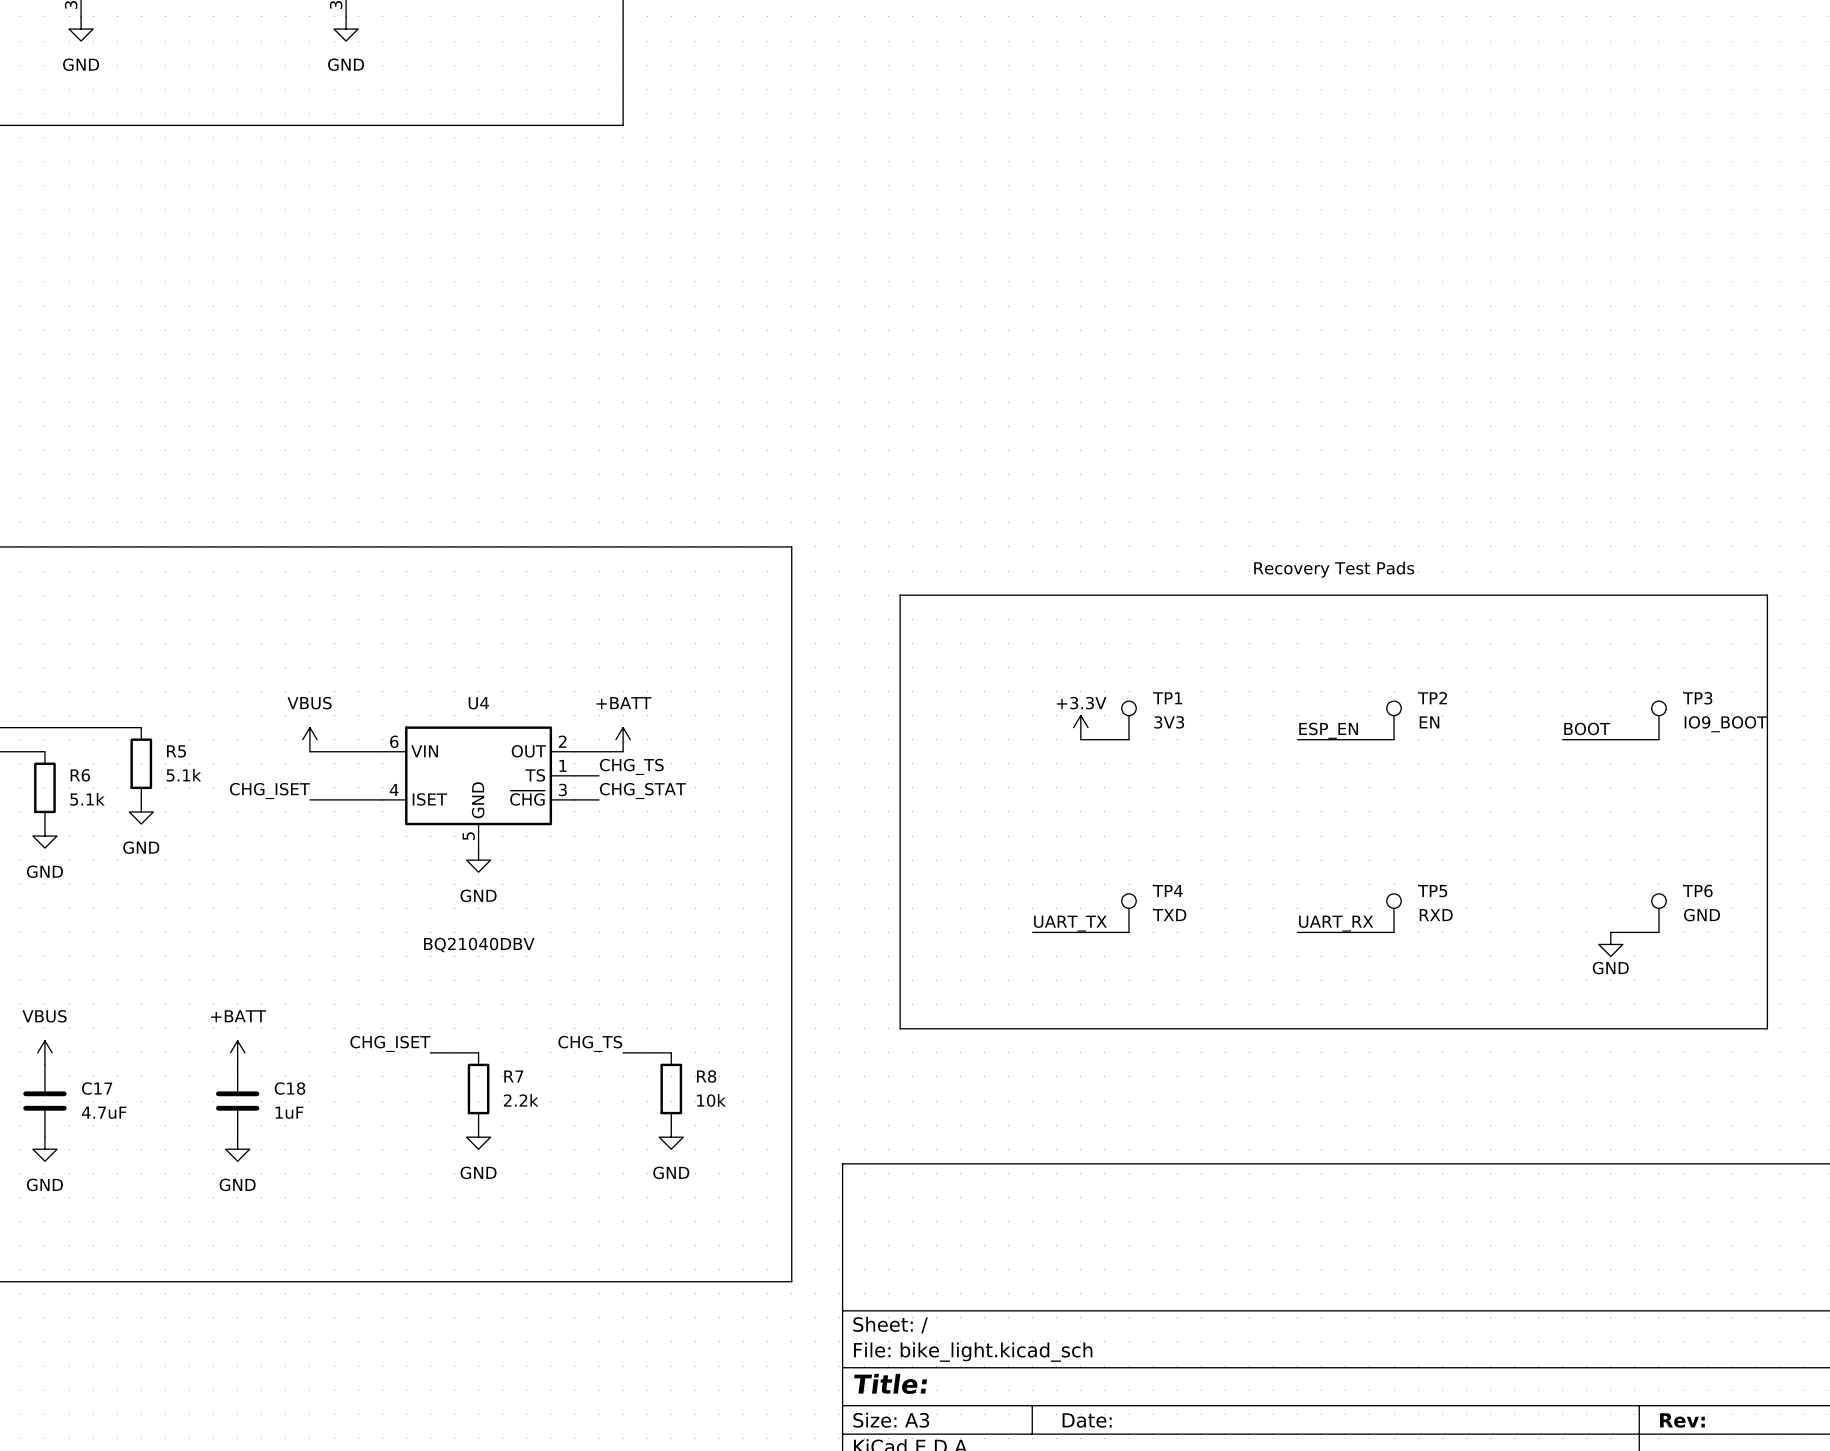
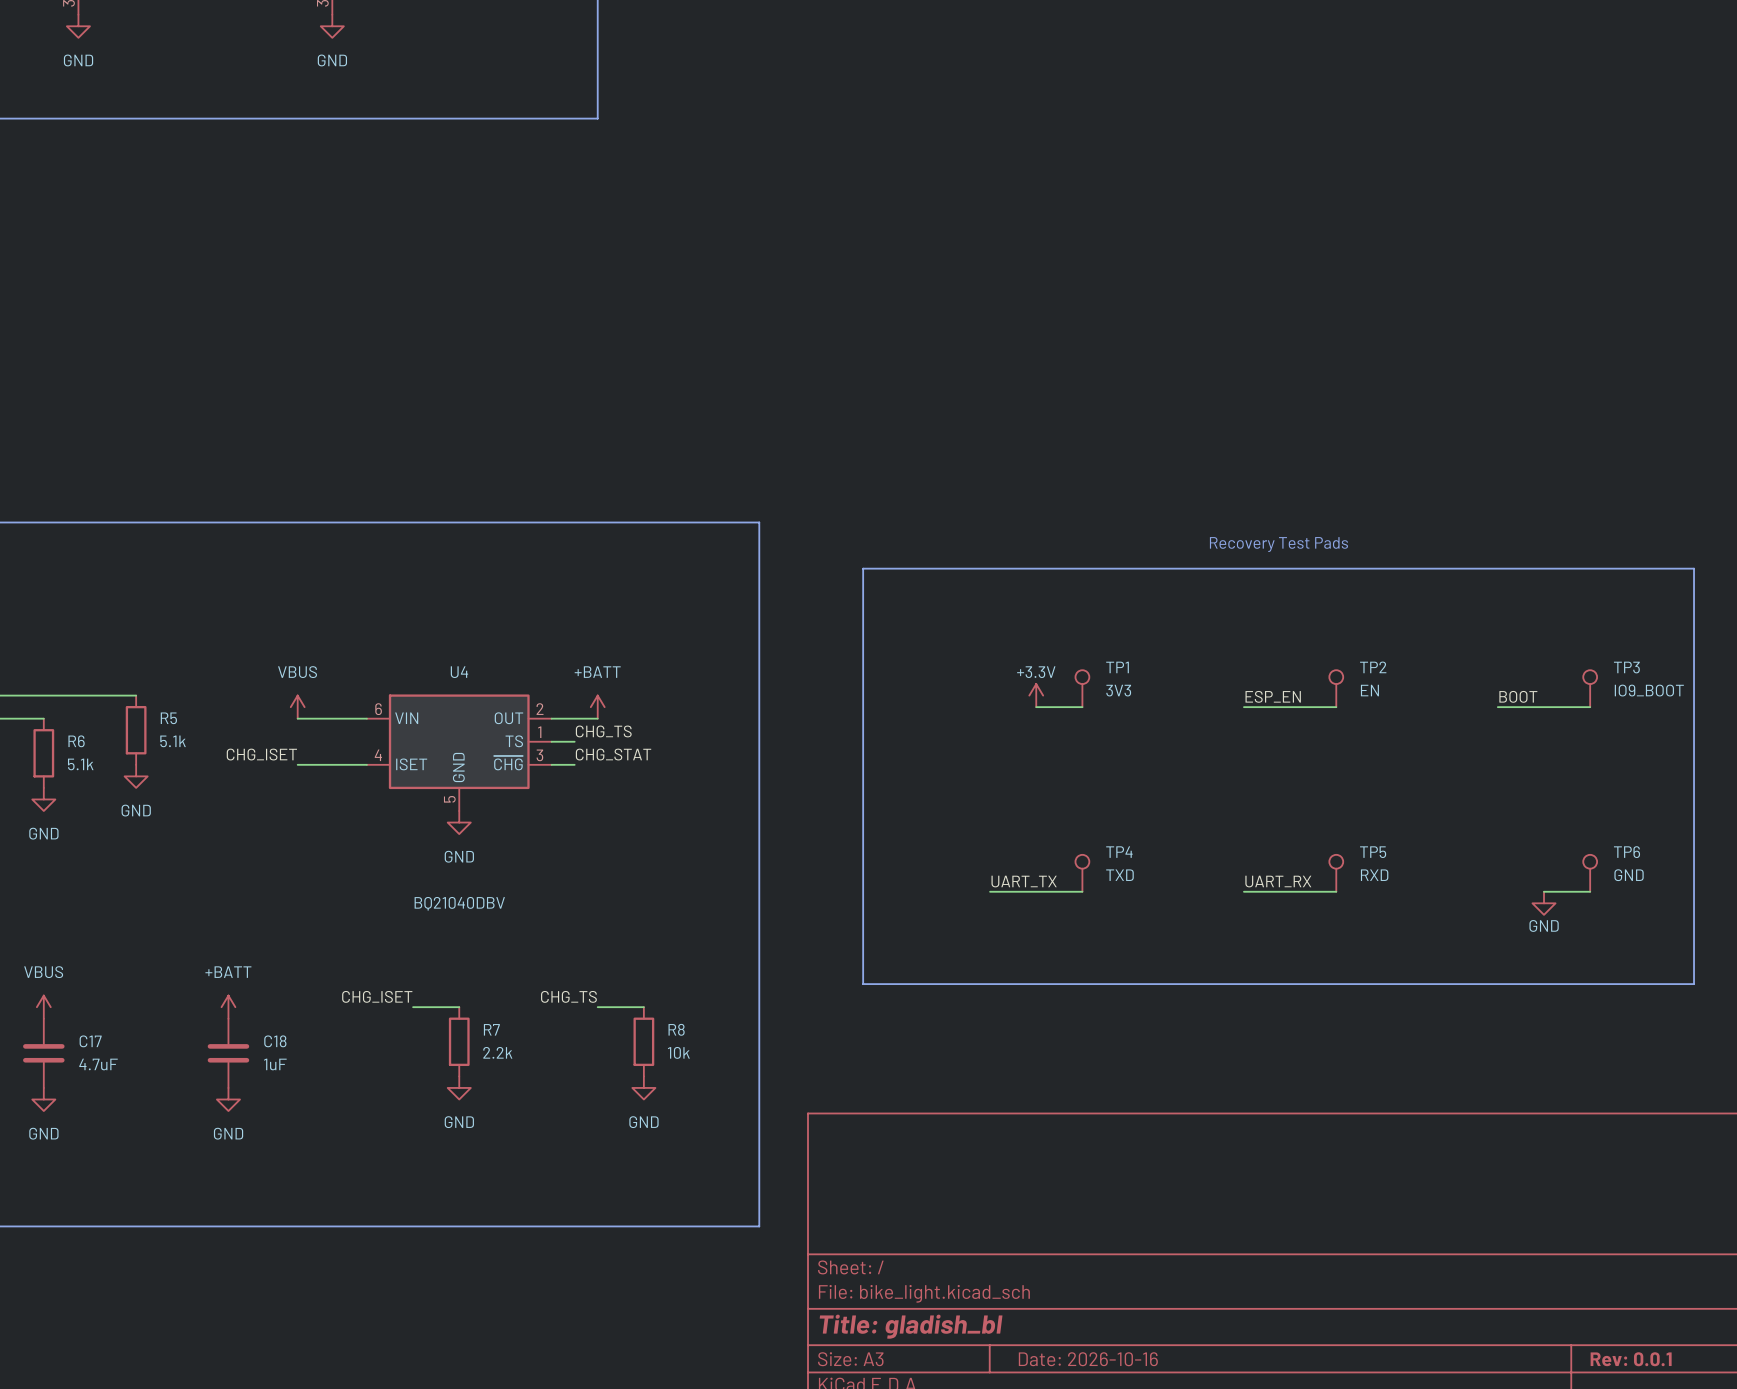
title block: Title: (890, 1383) -> Title: gladish_bl (911, 1326)
title block: Date: (1087, 1420) -> Date: 2026-10-16 (1088, 1359)
title block: Rev: (1682, 1420) -> Rev: 0.0.1 (1631, 1359)

